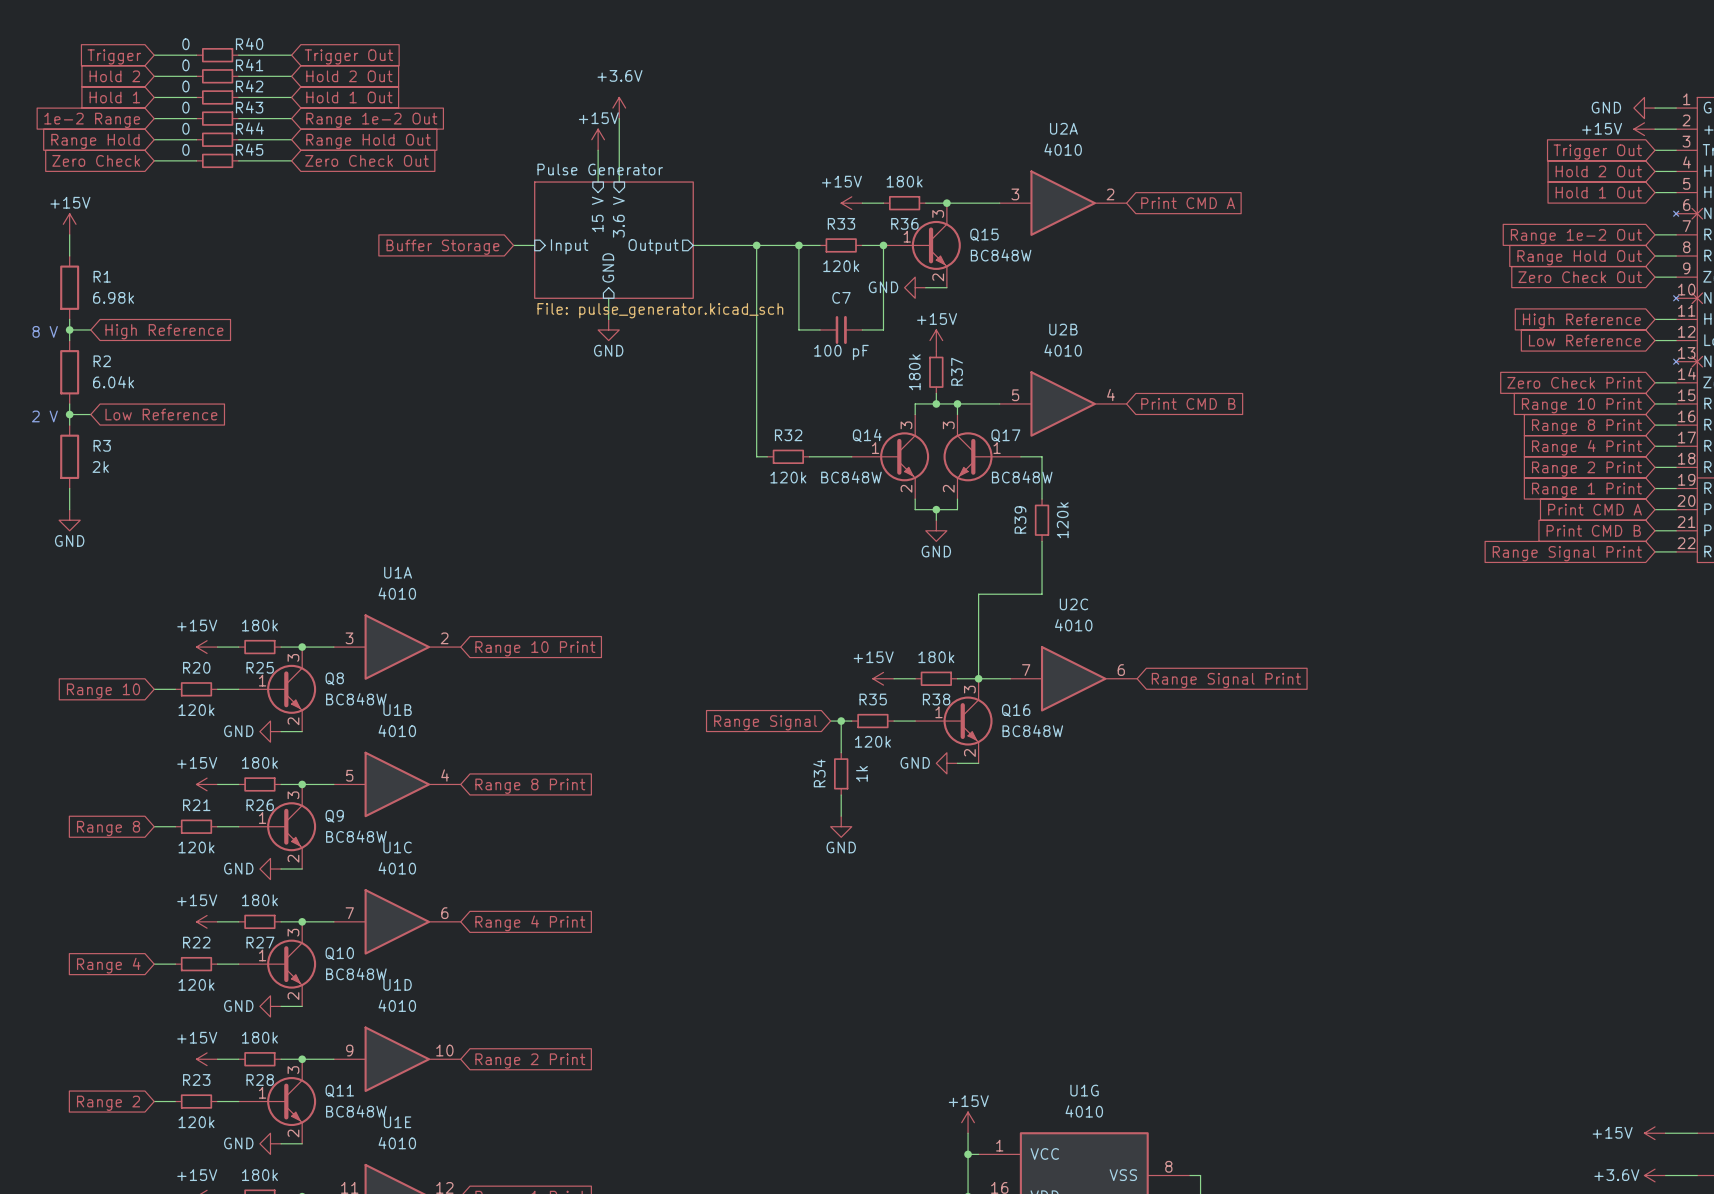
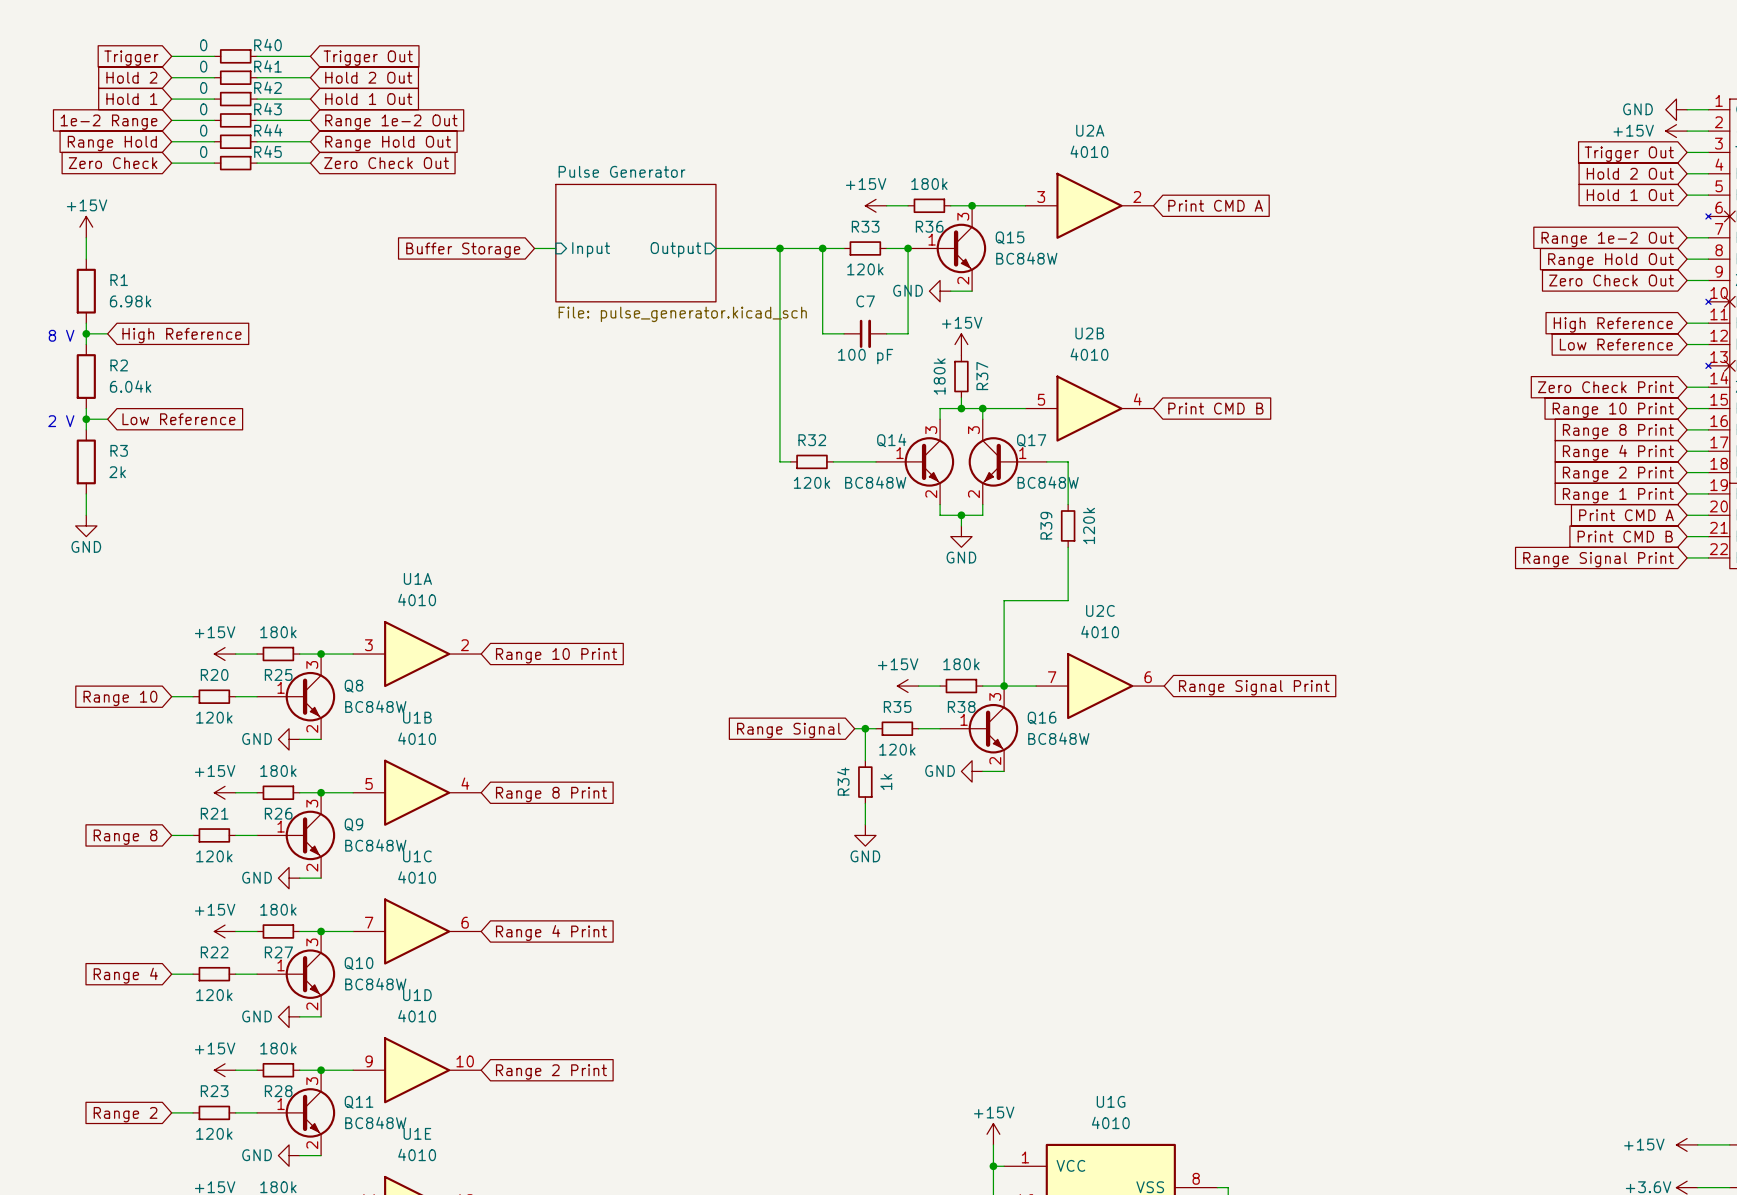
power symbol: +3.6V (619, 108) -> none
wire: (619, 118) (619, 182) -> none
power symbol: +15V (598, 139) -> none
wire: (598, 150) (598, 182) -> none
sheet pin: 15 V (597, 214) -> none
sheet pin: 3.6 V (618, 217) -> none
sheet pin: GND (608, 267) -> none
wire: (608, 298) (608, 319) -> none
power symbol: GND (608, 329) -> none

